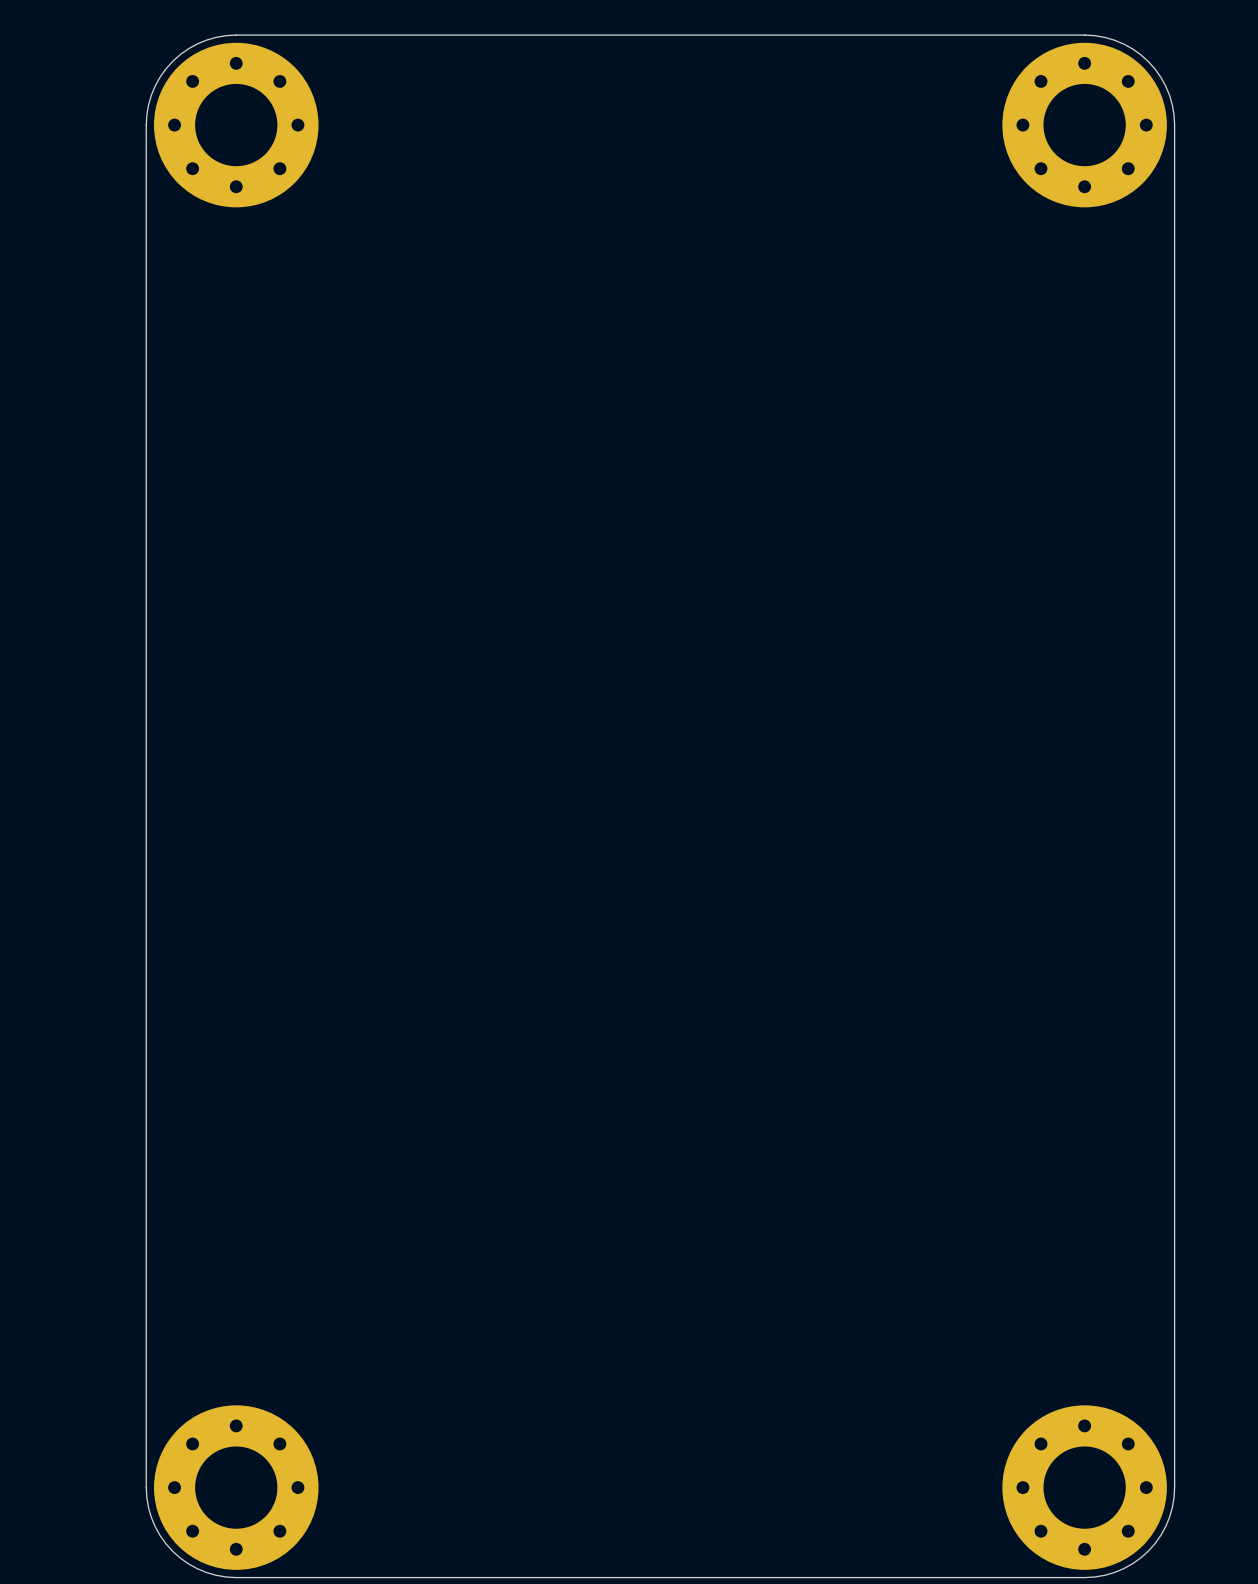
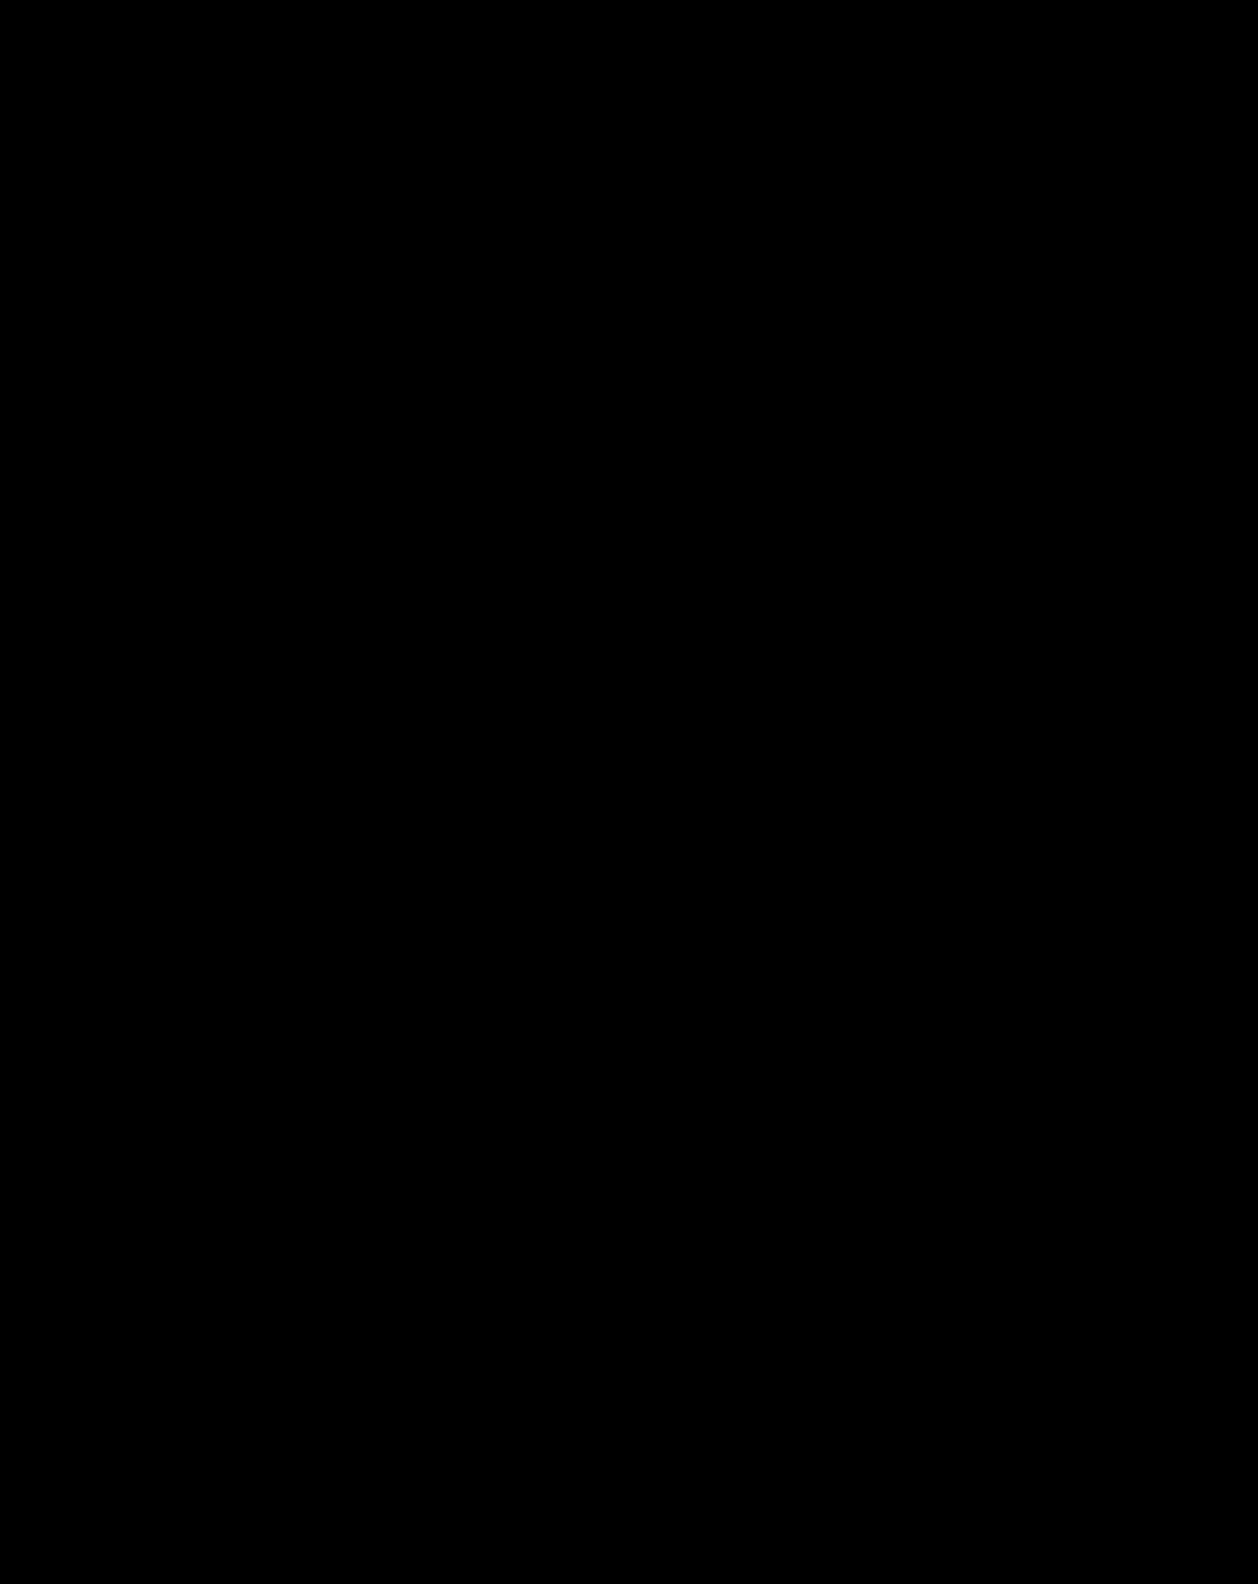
board edge: (236, 35) (1084, 35) (1104, 37) (1132, 48) (1148, 61) (1160, 77) (1172, 105) (1174, 125) (1174, 1487) (1172, 1507) (1165, 1526) (1154, 1543) (1132, 1563) (1114, 1572) (1084, 1577) (236, 1577) (216, 1575) (197, 1568) (172, 1551) (160, 1535) (151, 1517) (146, 1487) (146, 125) (151, 95) (160, 77) (172, 61) (197, 44) (216, 37) (236, 35) -> none
part: (236, 125) -> none
part: (1084, 125) -> none
part: (236, 1487) -> none
part: (1084, 1487) -> none

